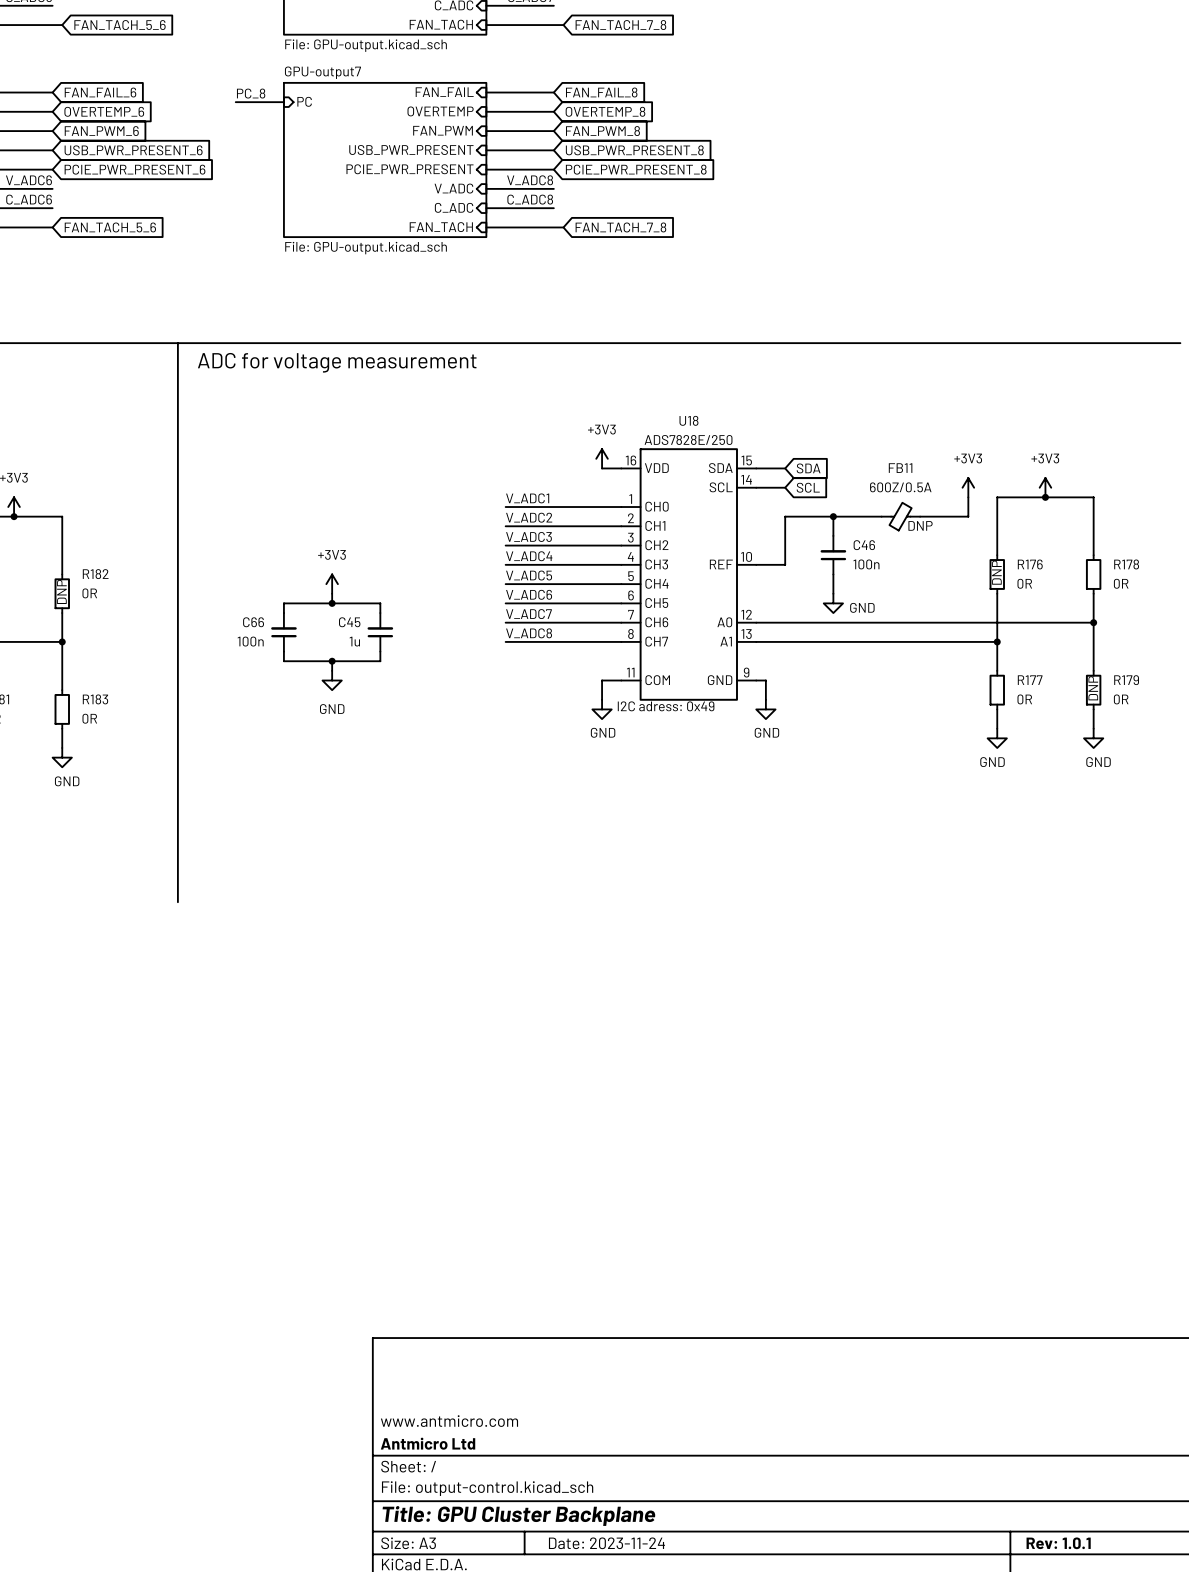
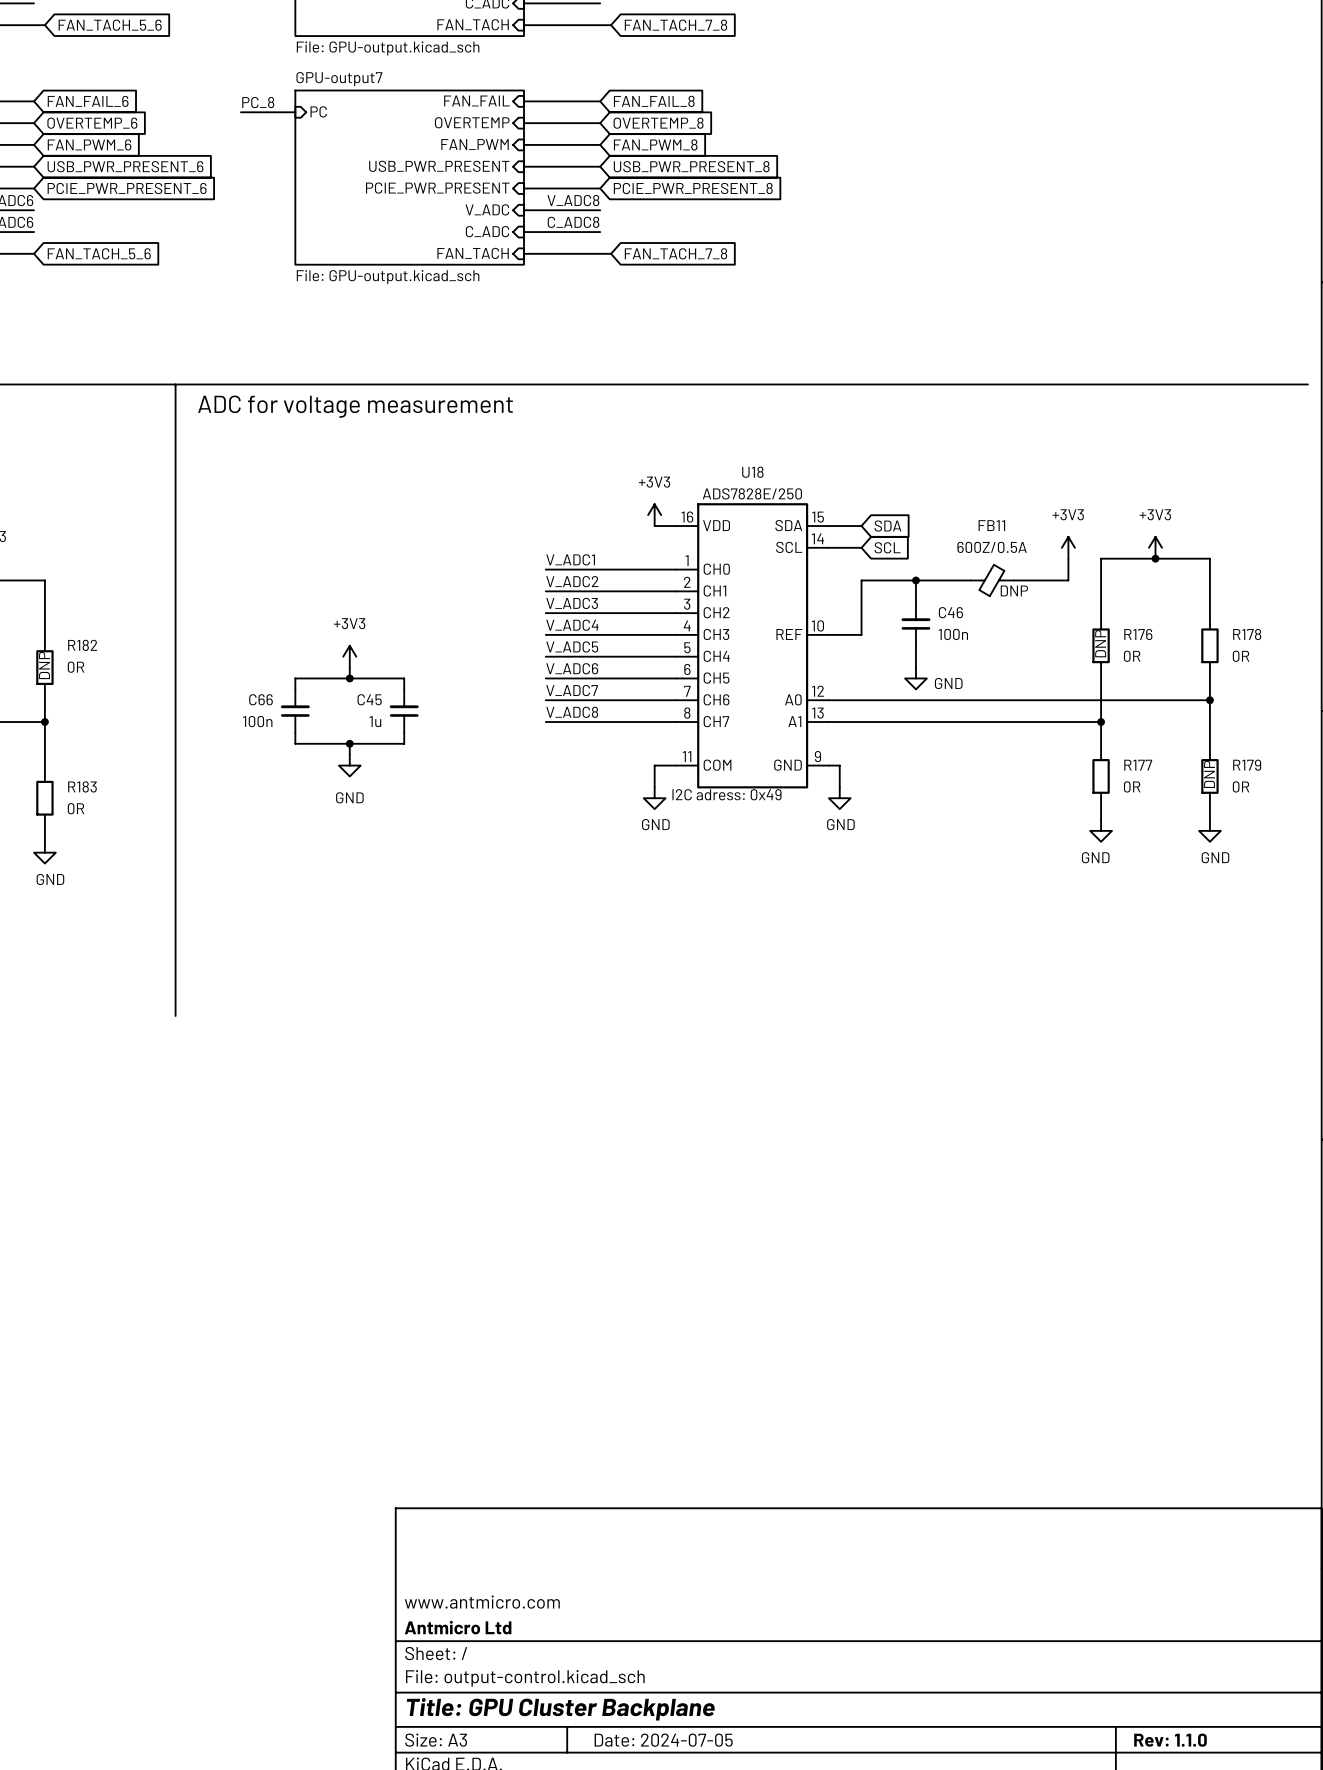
title block: Date: 2023-11-24 (606, 1543) -> Date: 2024-07-05 (663, 1740)
title block: Rev: 1.0.1 (1058, 1543) -> Rev: 1.1.0 (1170, 1740)

